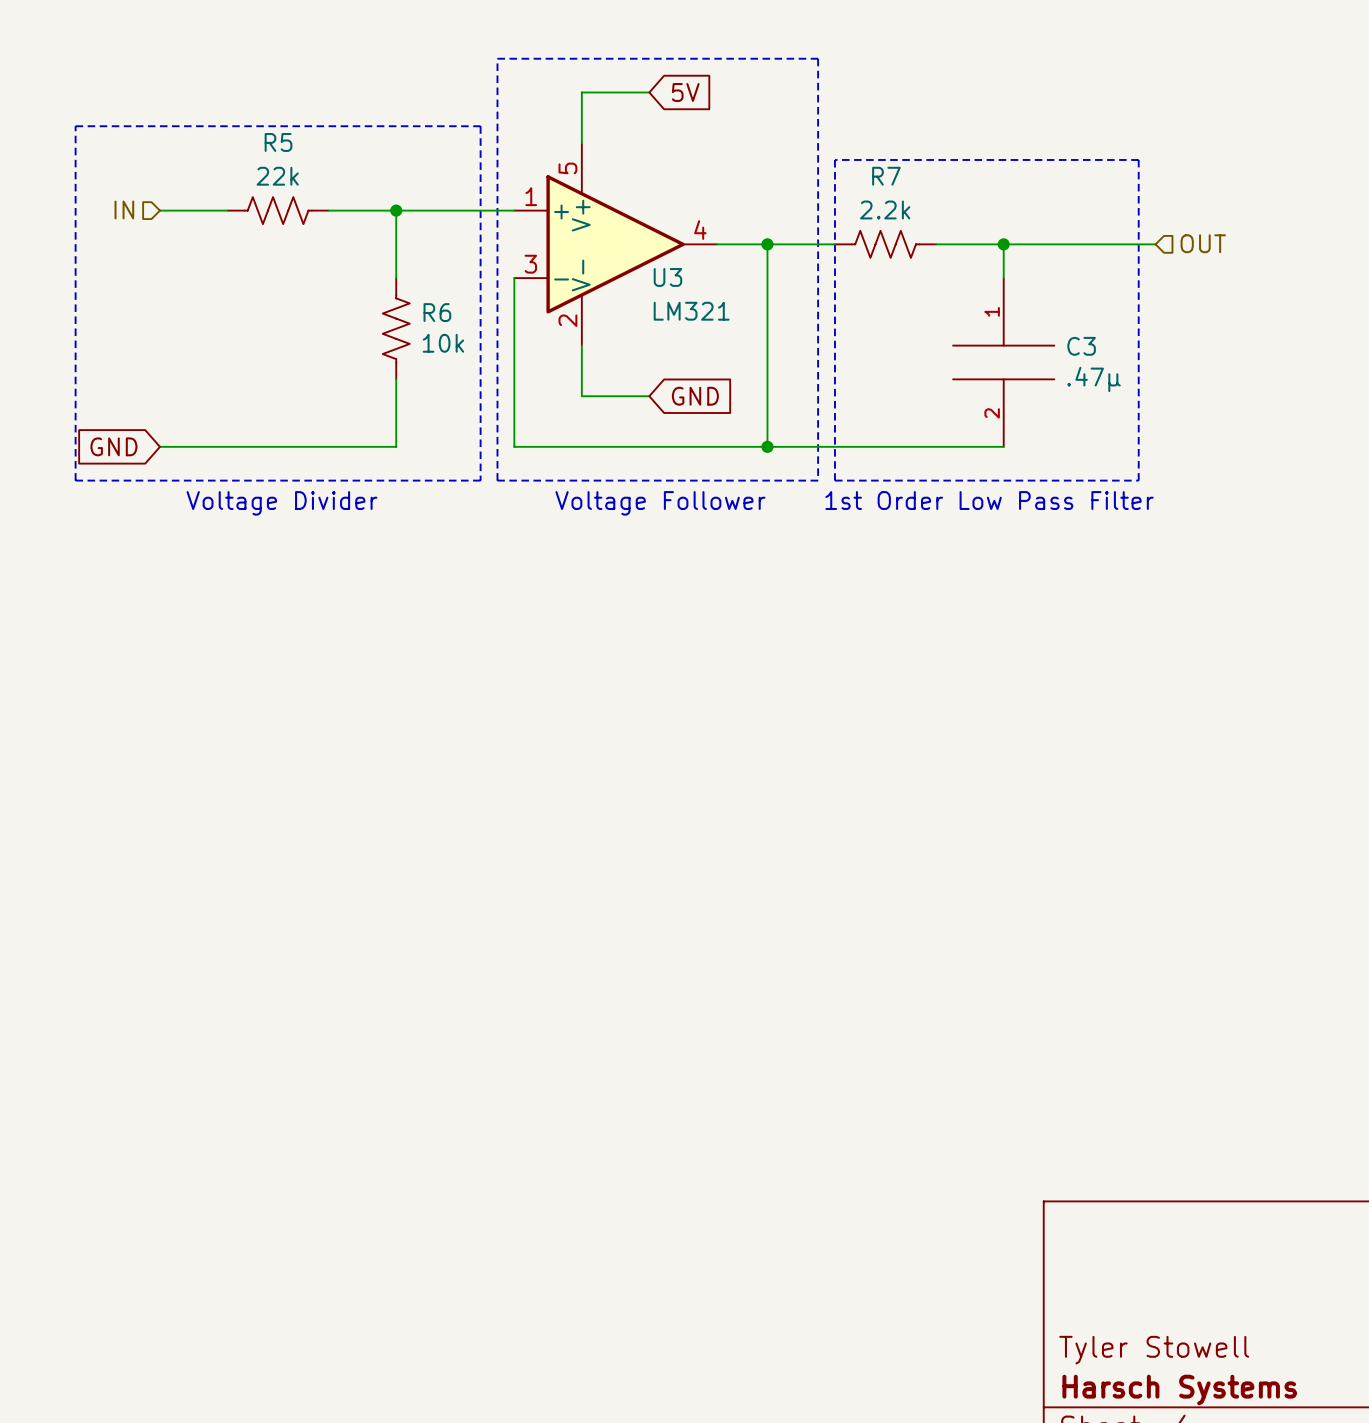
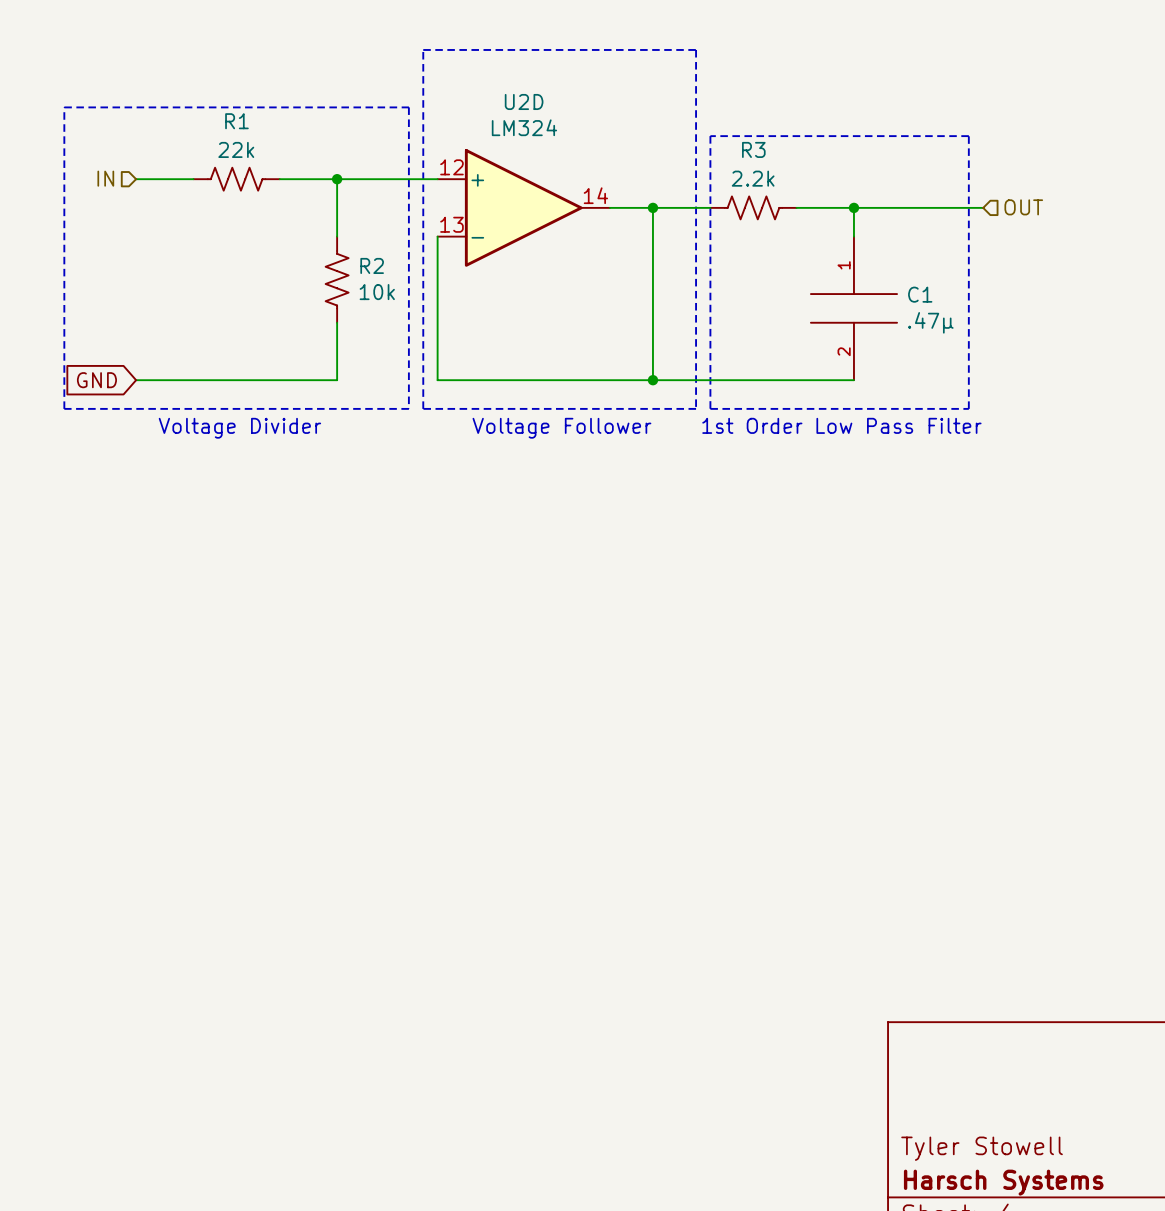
wire: (649, 92) (581, 92) (581, 143) -> none
global label: 5V (685, 92) -> none
R5 name: R5 (278, 142) -> R1 (236, 121)
R7 name: R7 (886, 176) -> R3 (753, 149)
U3: LM321 (615, 244) -> none
U2D: none -> LM324 (523, 207)
R6 name: R6 (437, 312) -> R2 (372, 265)
wire: (581, 345) (581, 396) (649, 396) -> none
C3 name: C3 (1081, 346) -> C1 (920, 294)
global label: GND (695, 396) -> none

